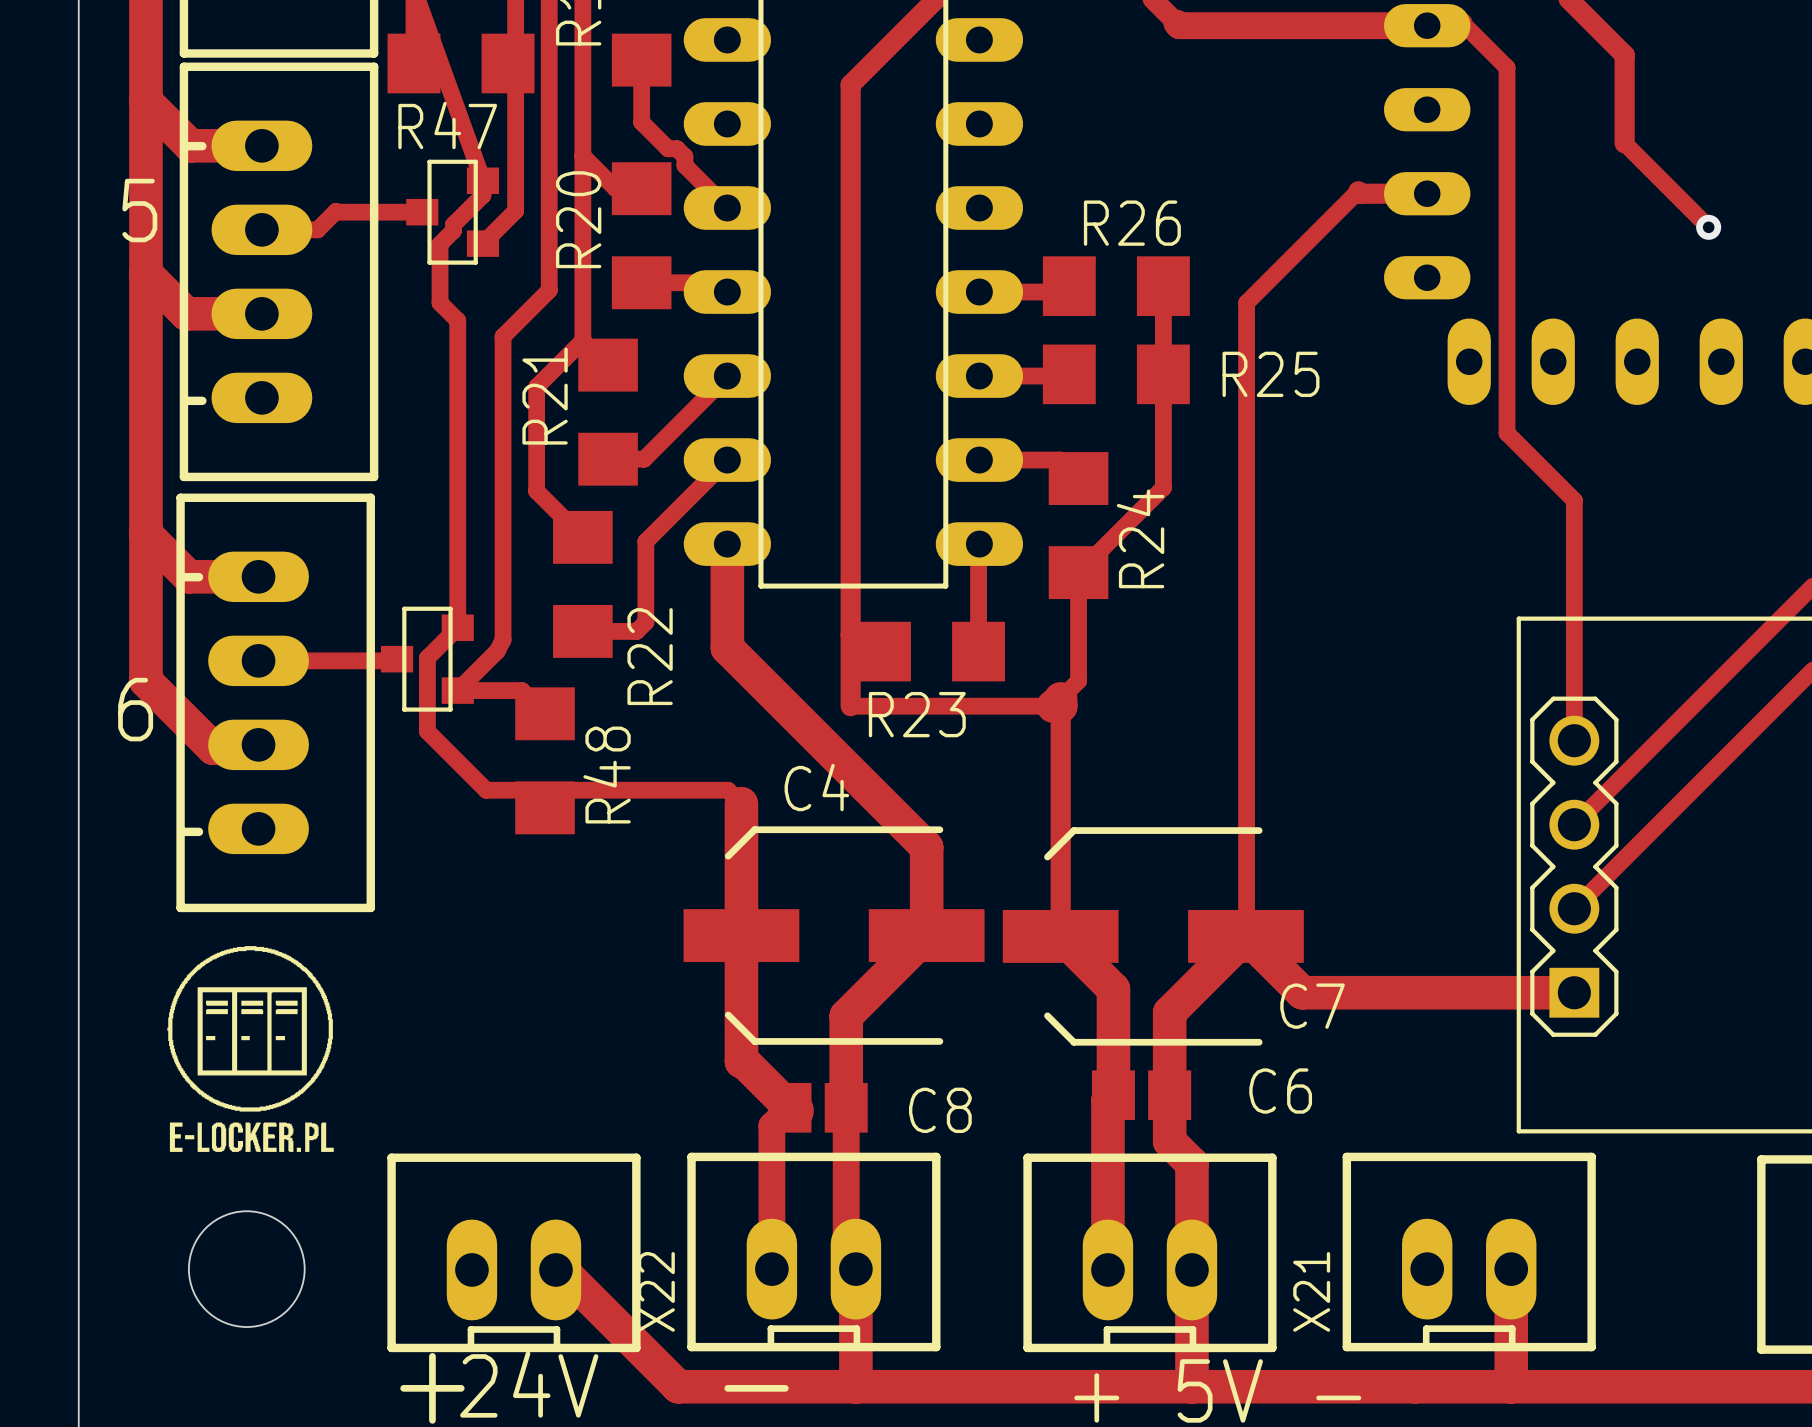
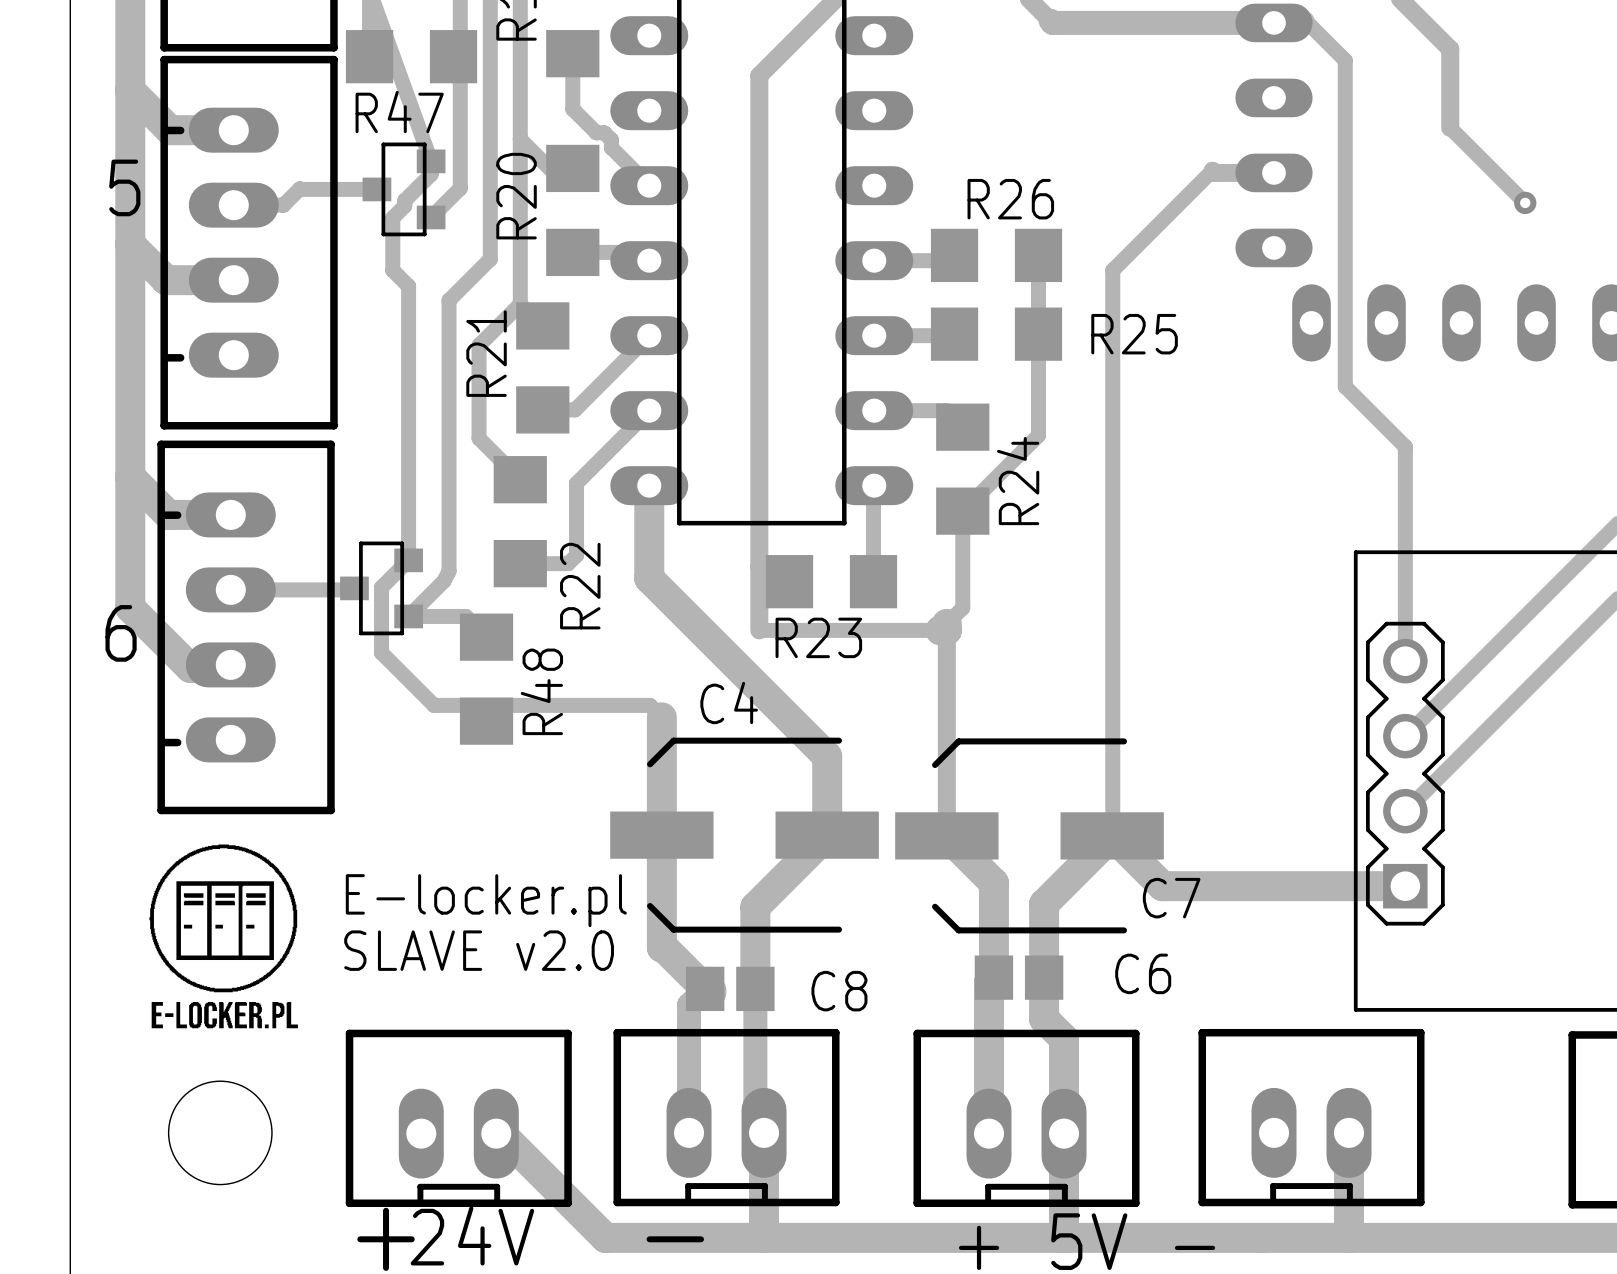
text: none -> E-locker.pl (486, 900)
text: none -> SLAVE v2.0 (479, 950)
X22 name: X22 (656, 1291) -> none
X21 name: X21 (1311, 1291) -> none

